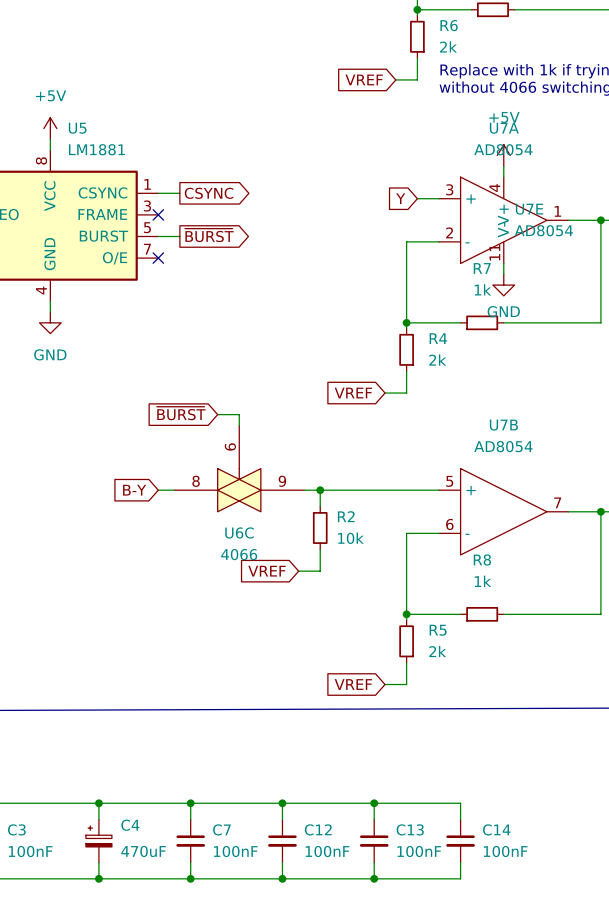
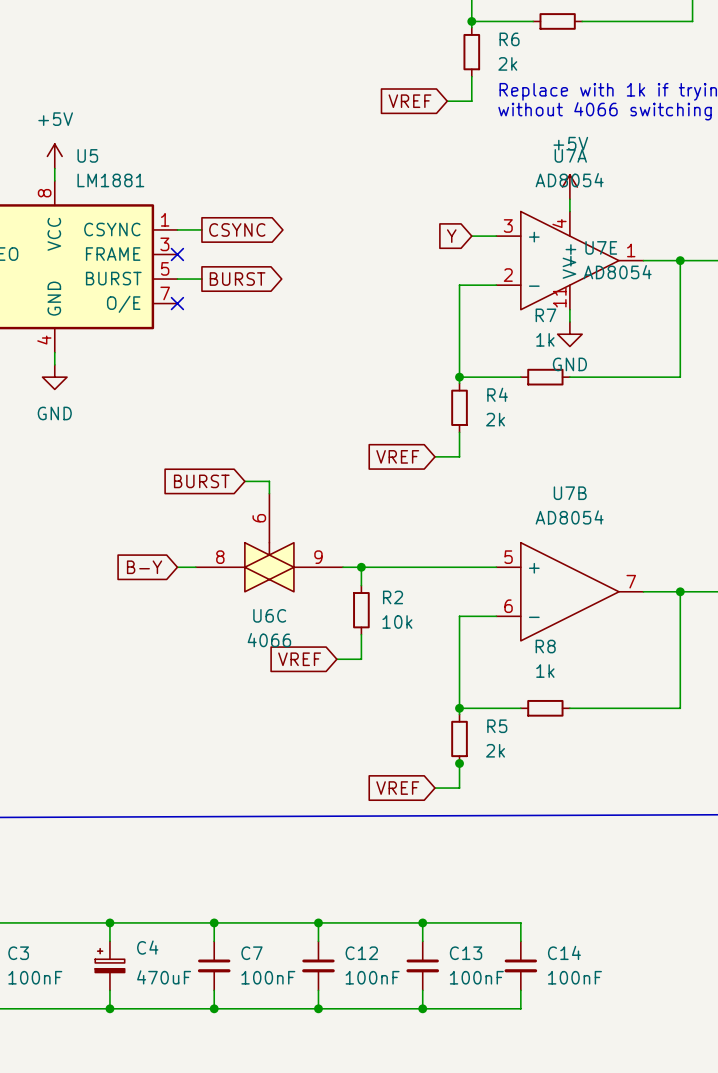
global label: ~{BURST} (209, 235) -> BURST (237, 279)
global label: ~{BURST} (181, 413) -> BURST (201, 481)
junction: none -> (459, 763)

